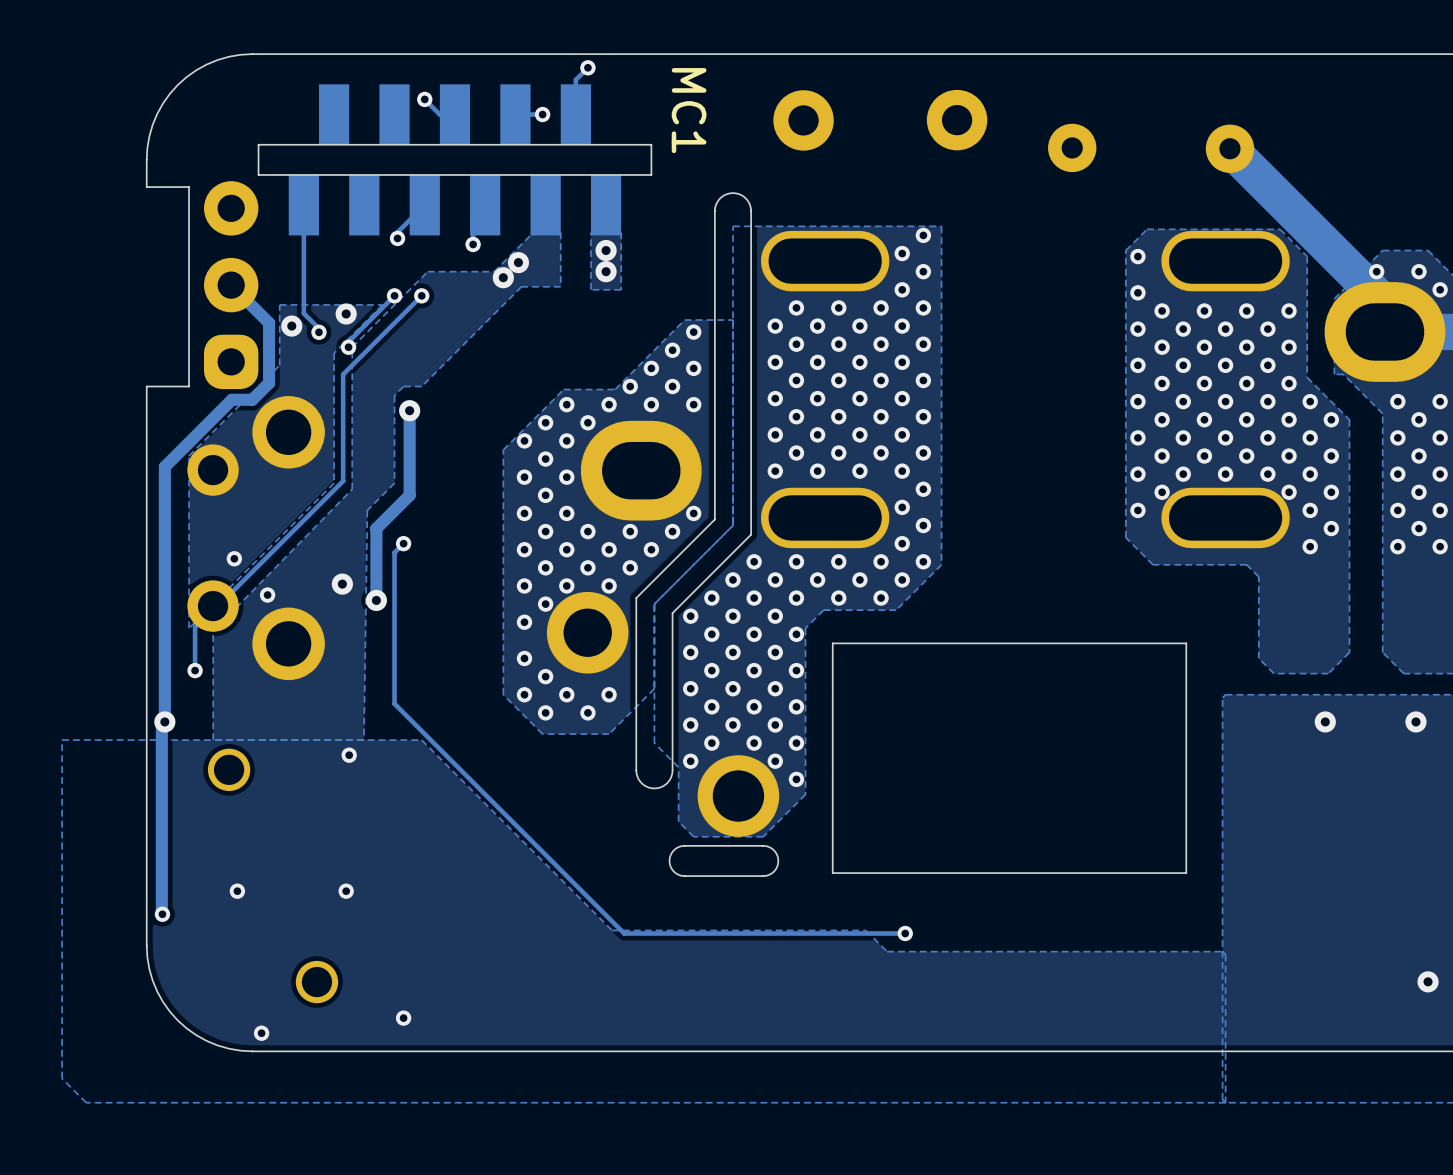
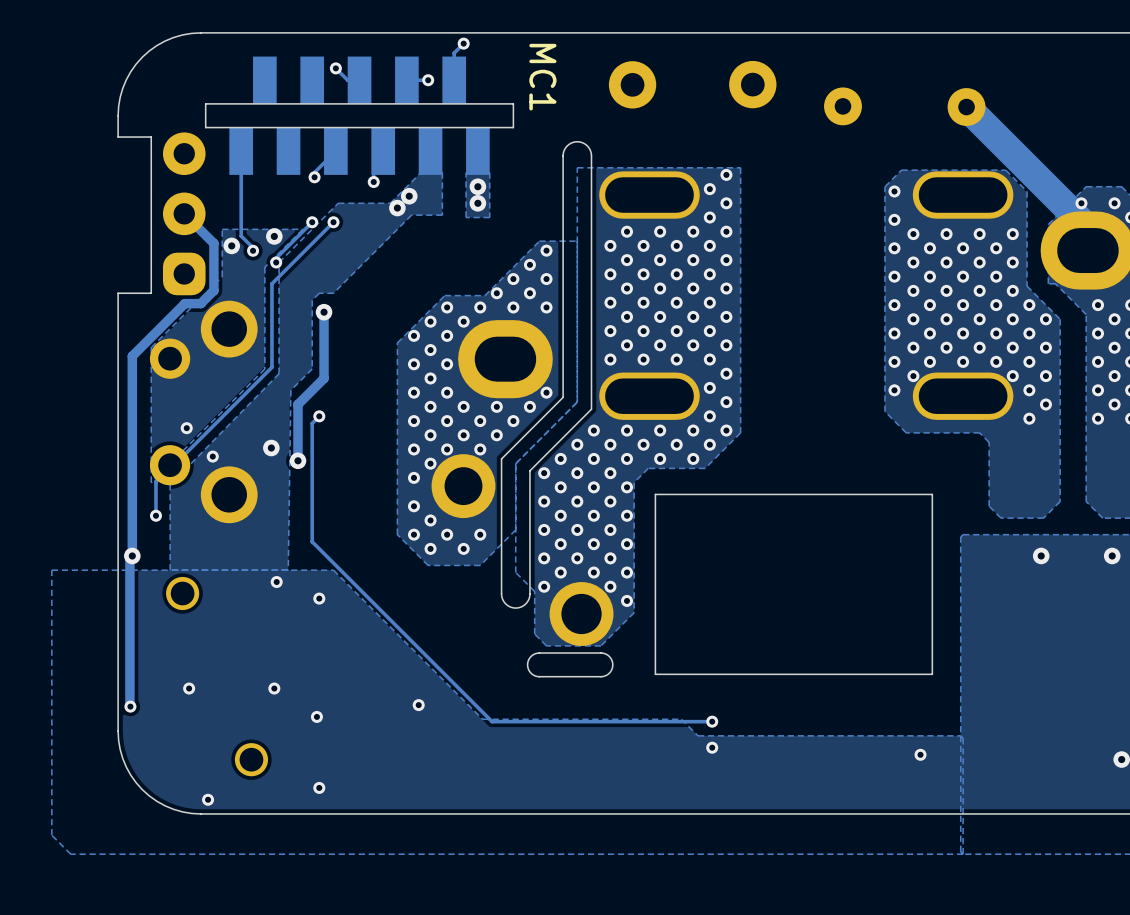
via: none -> (319, 598)
via: none -> (418, 705)
via: none -> (316, 716)
via: none -> (712, 747)
via: none -> (920, 754)

